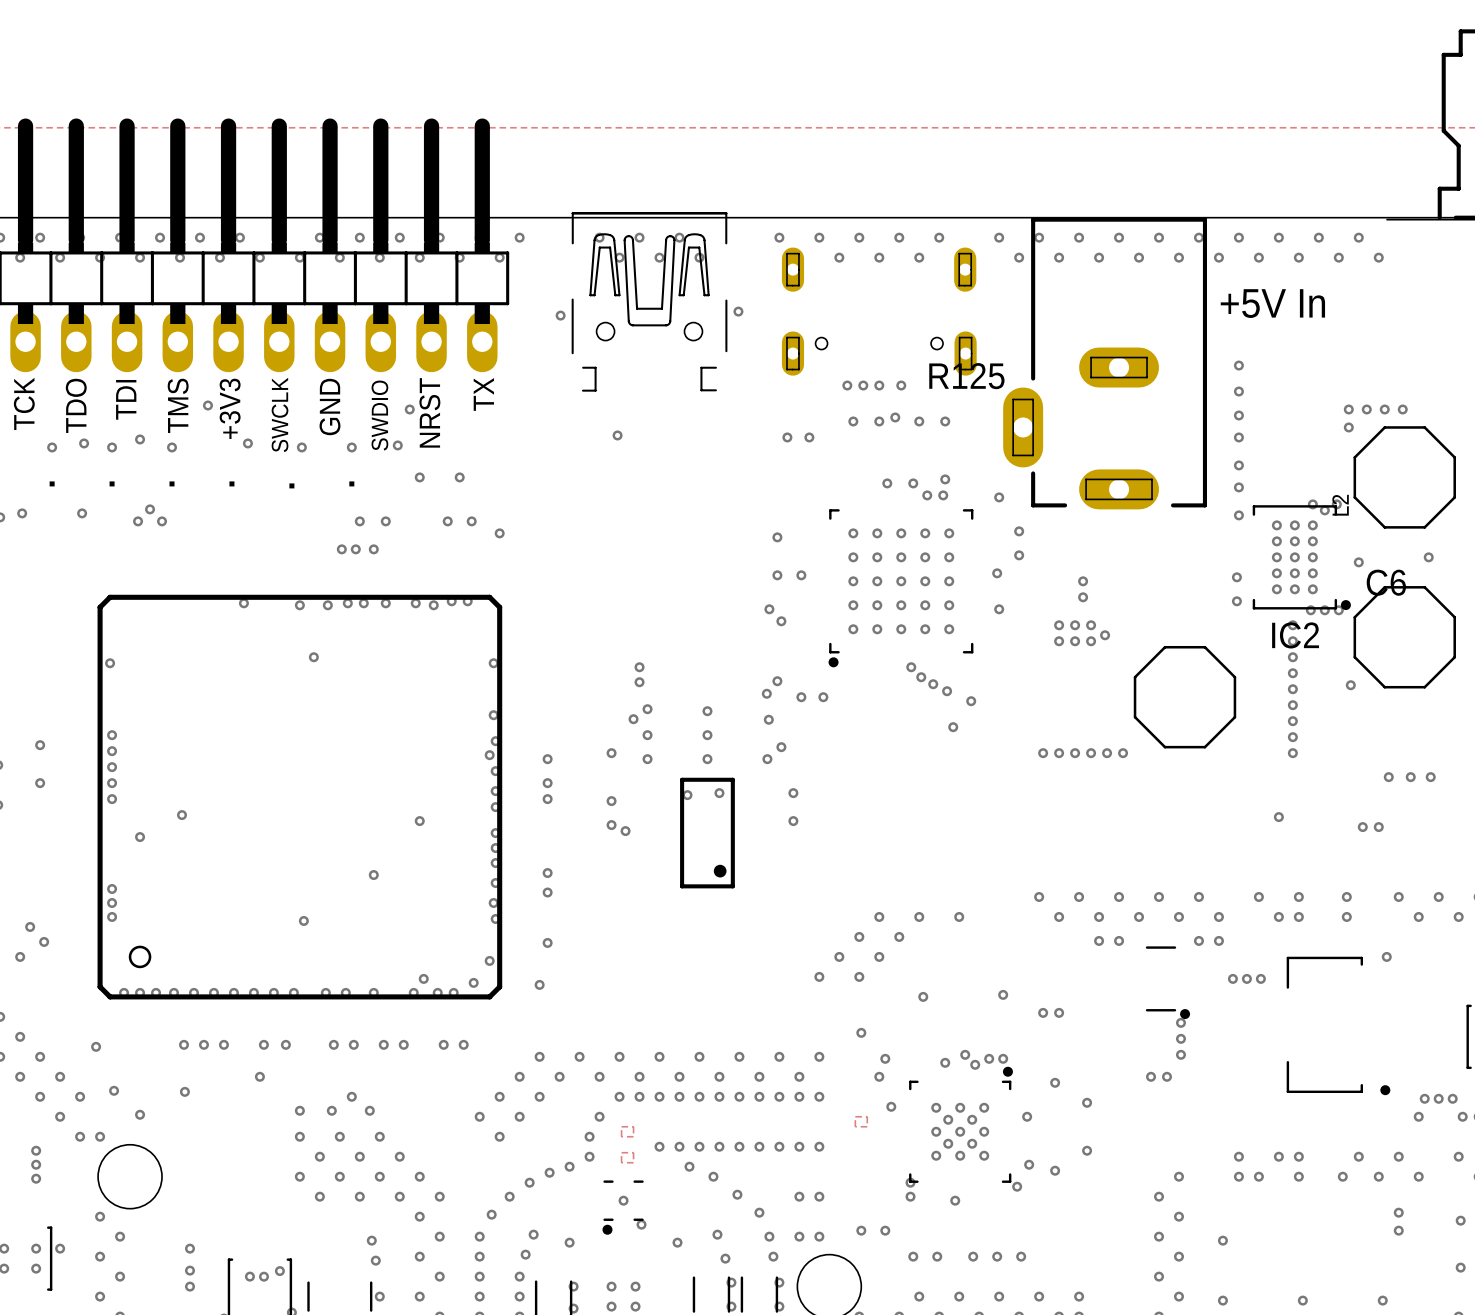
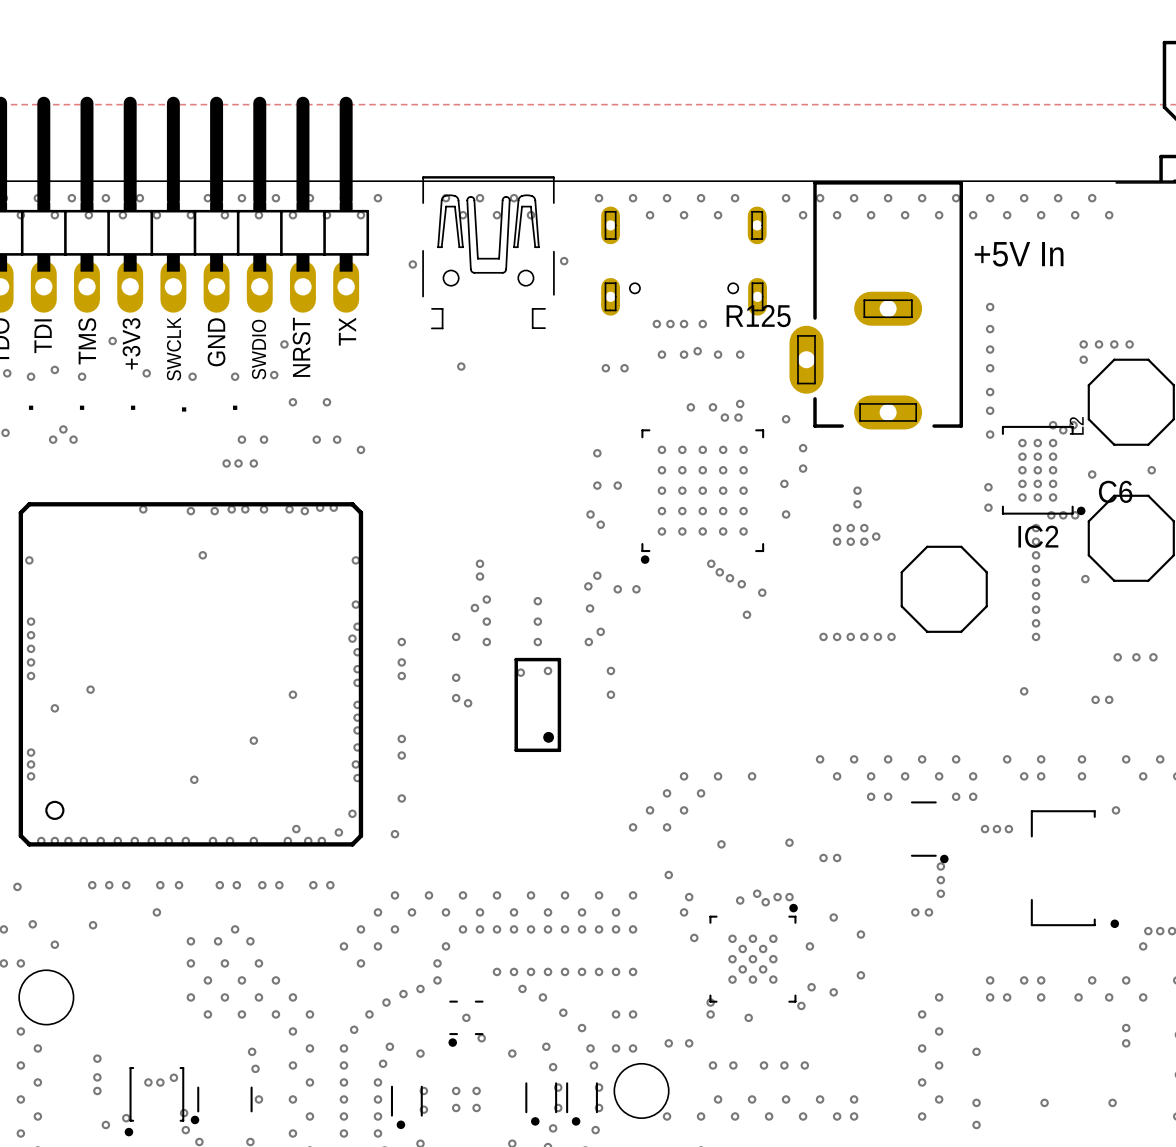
zone outline: (855, 1116) (855, 1126) (867, 1126) (867, 1116) (855, 1116) -> none
zone outline: (621, 1126) (621, 1136) (633, 1136) (633, 1126) (621, 1126) -> none
zone outline: (621, 1152) (621, 1162) (633, 1162) (633, 1152) (621, 1152) -> none

